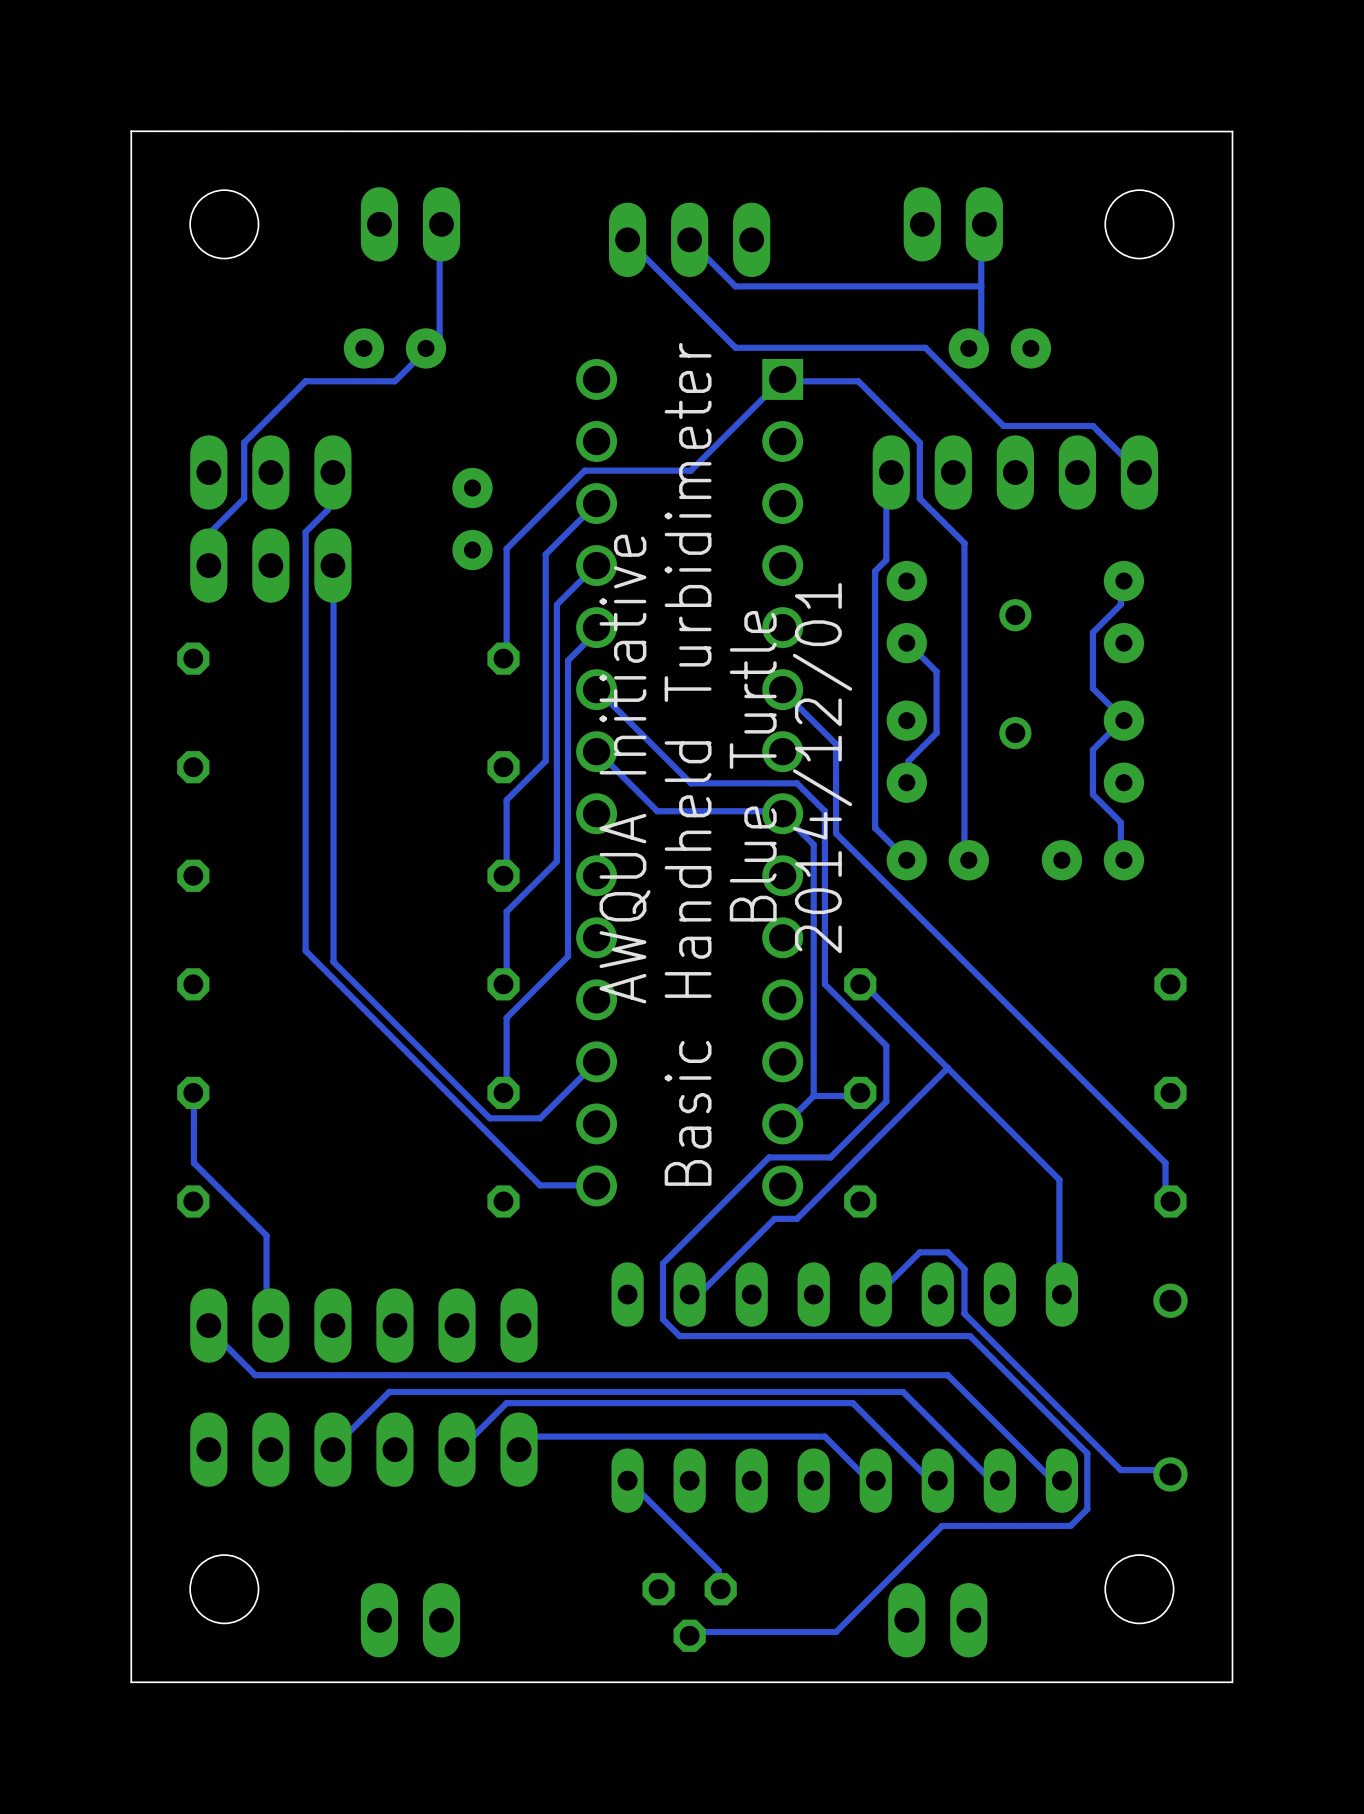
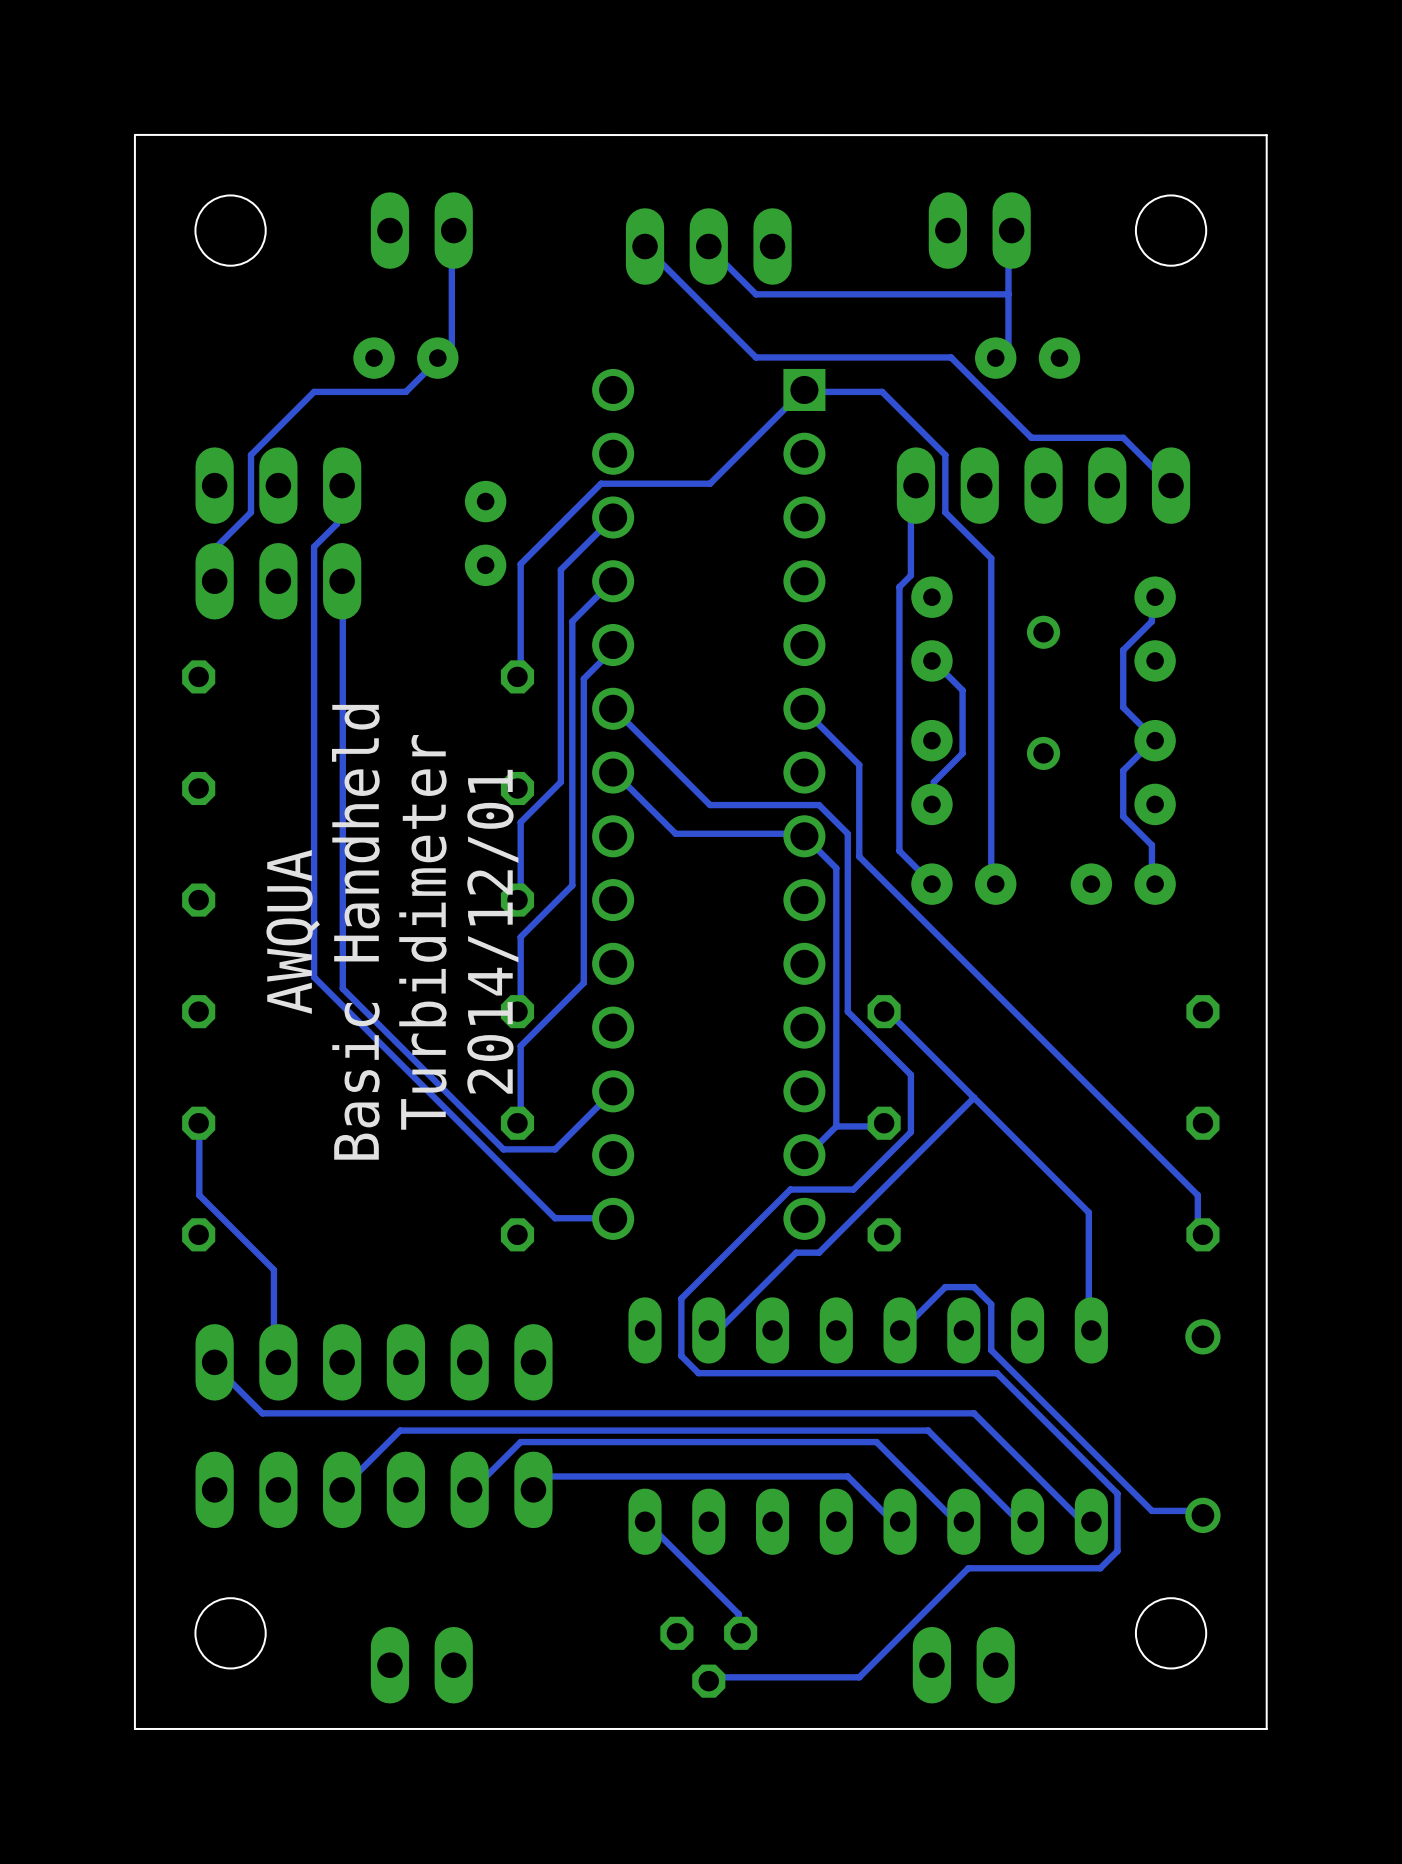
text: Basic Handheld Turbidimeter (688, 764) -> none
text: Blue Turtle (753, 766) -> none
text position: 2014/12/01 (822, 768) -> 2014/12/01 (492, 931)
text: AWQUA Initiative (625, 769) -> none
text: none -> AWQUA (293, 931)
text: none -> Basic Handheld (355, 932)
text: none -> Turbidimeter (422, 932)

